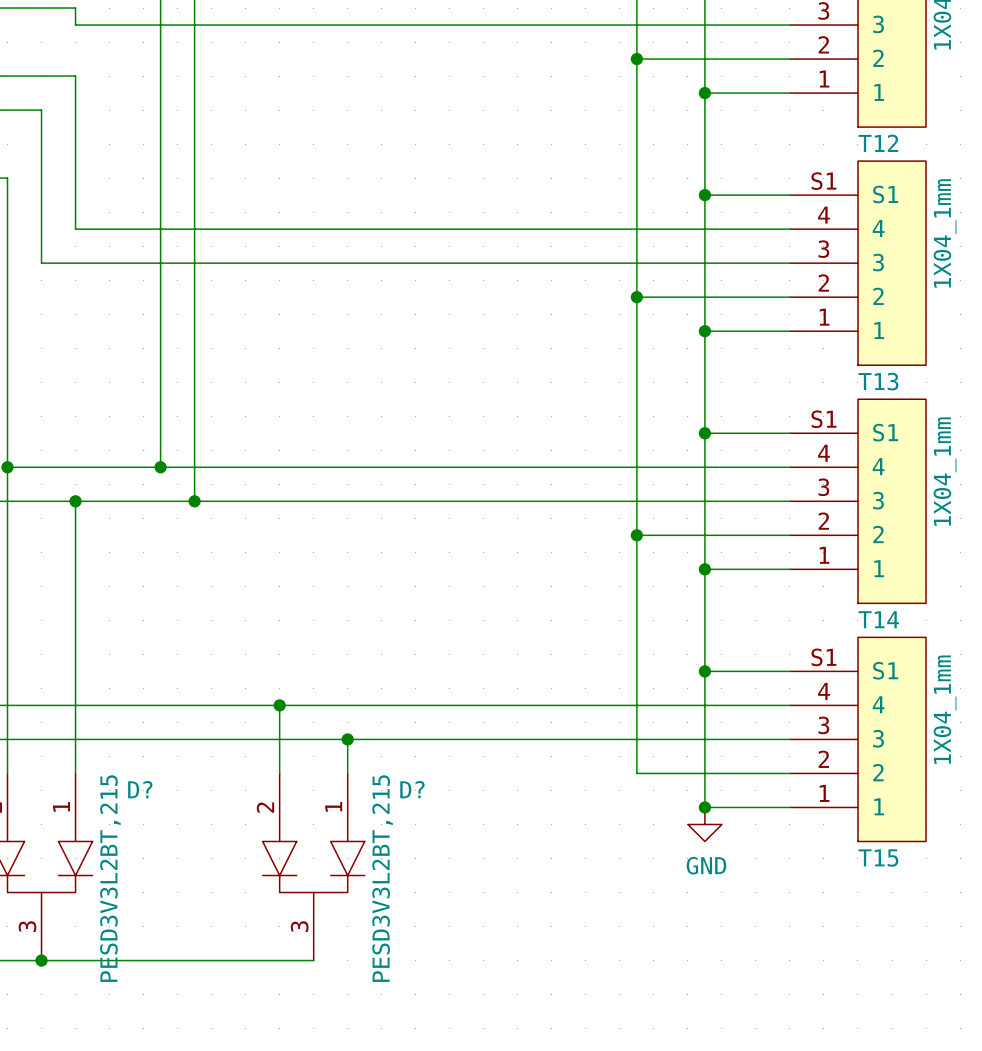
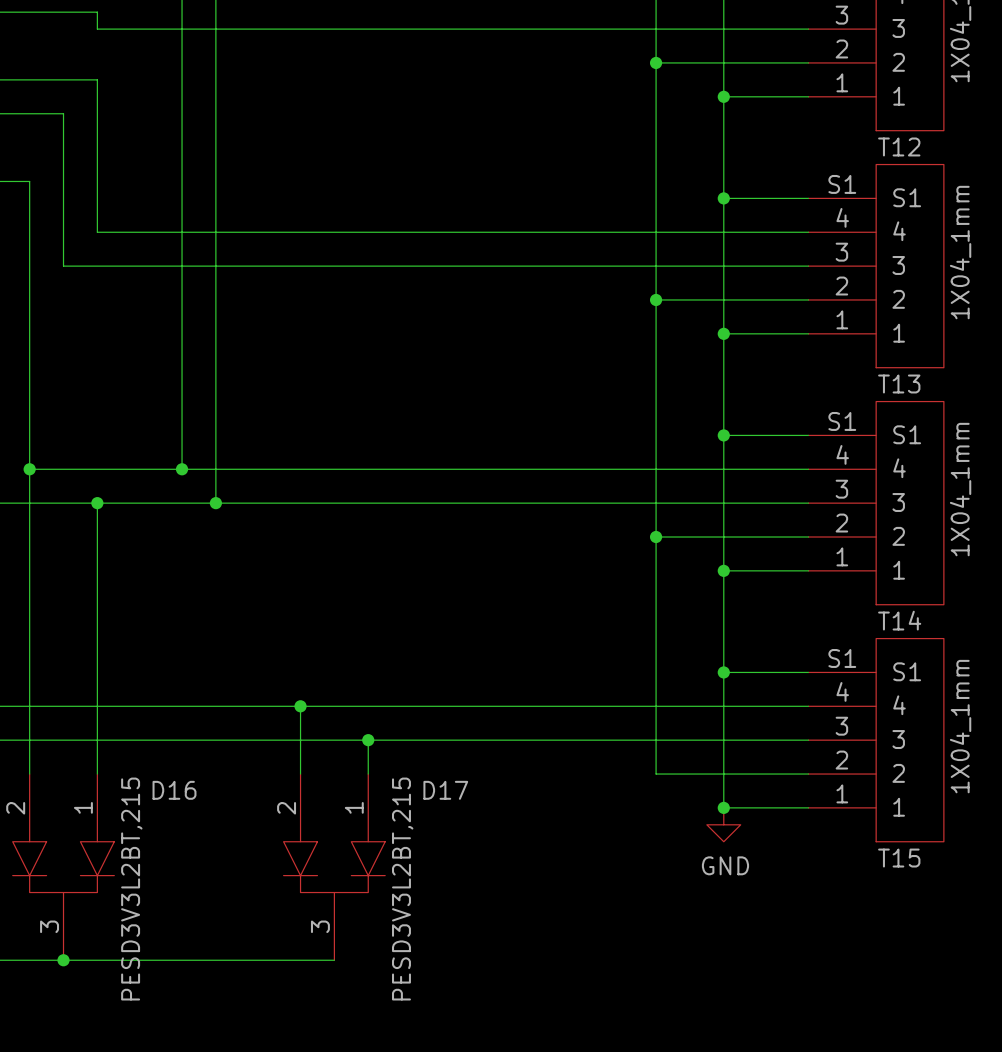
D? name: D? (140, 789) -> D16 (174, 790)
D? name: D? (412, 789) -> D17 (445, 790)

